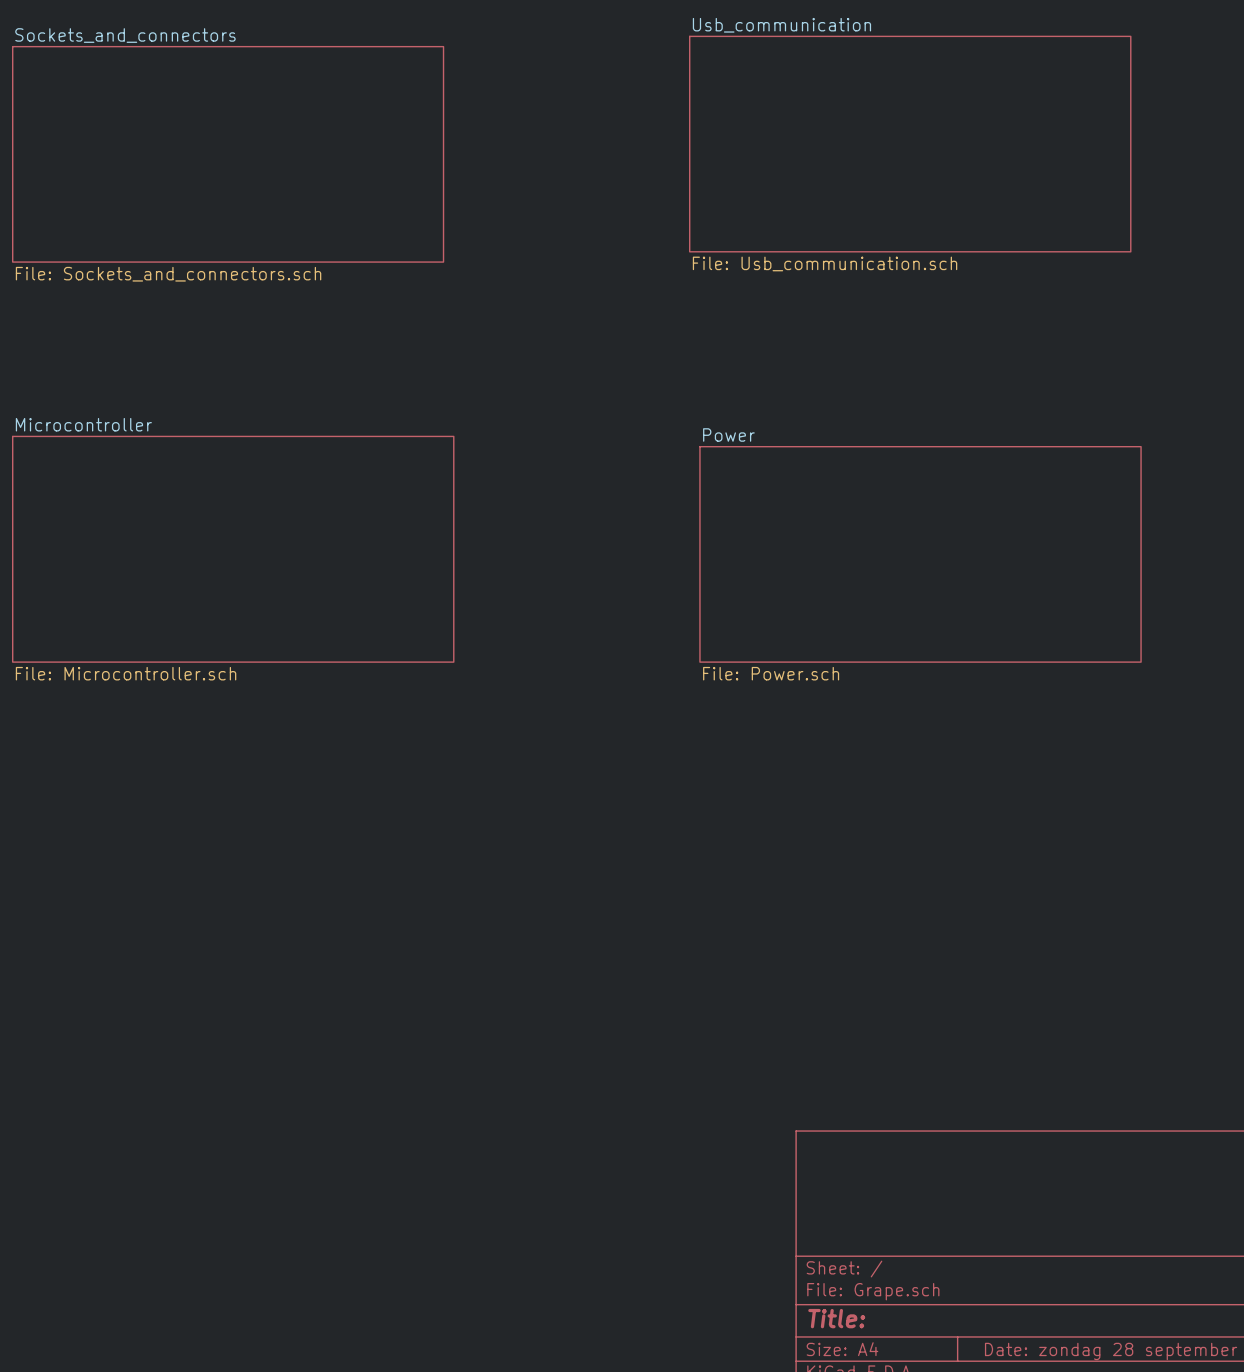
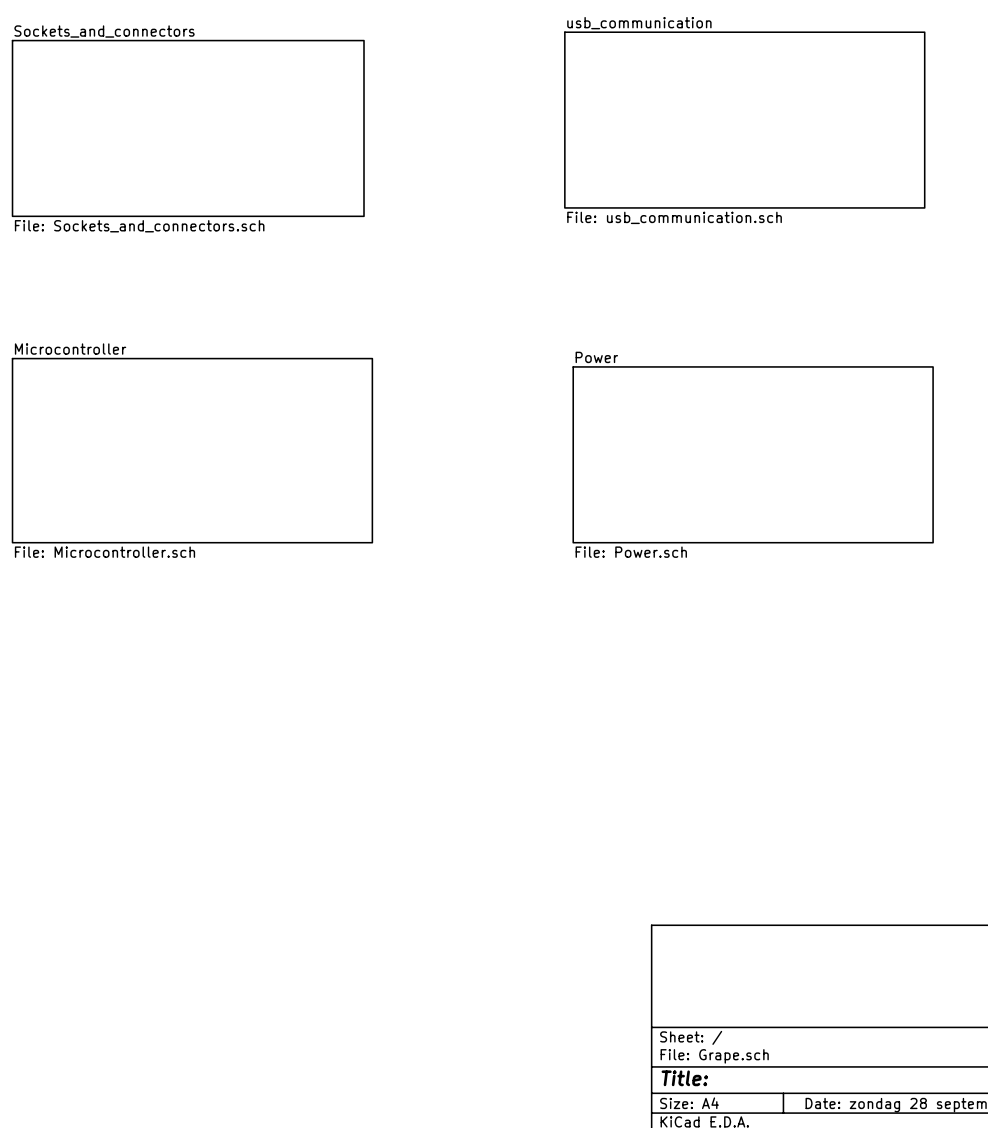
sheet Usb_communication name: Usb_communication (781, 25) -> usb_communication (639, 23)
sheet Usb_communication value: File: Usb_communication.sch (825, 263) -> File: usb_communication.sch (674, 217)

